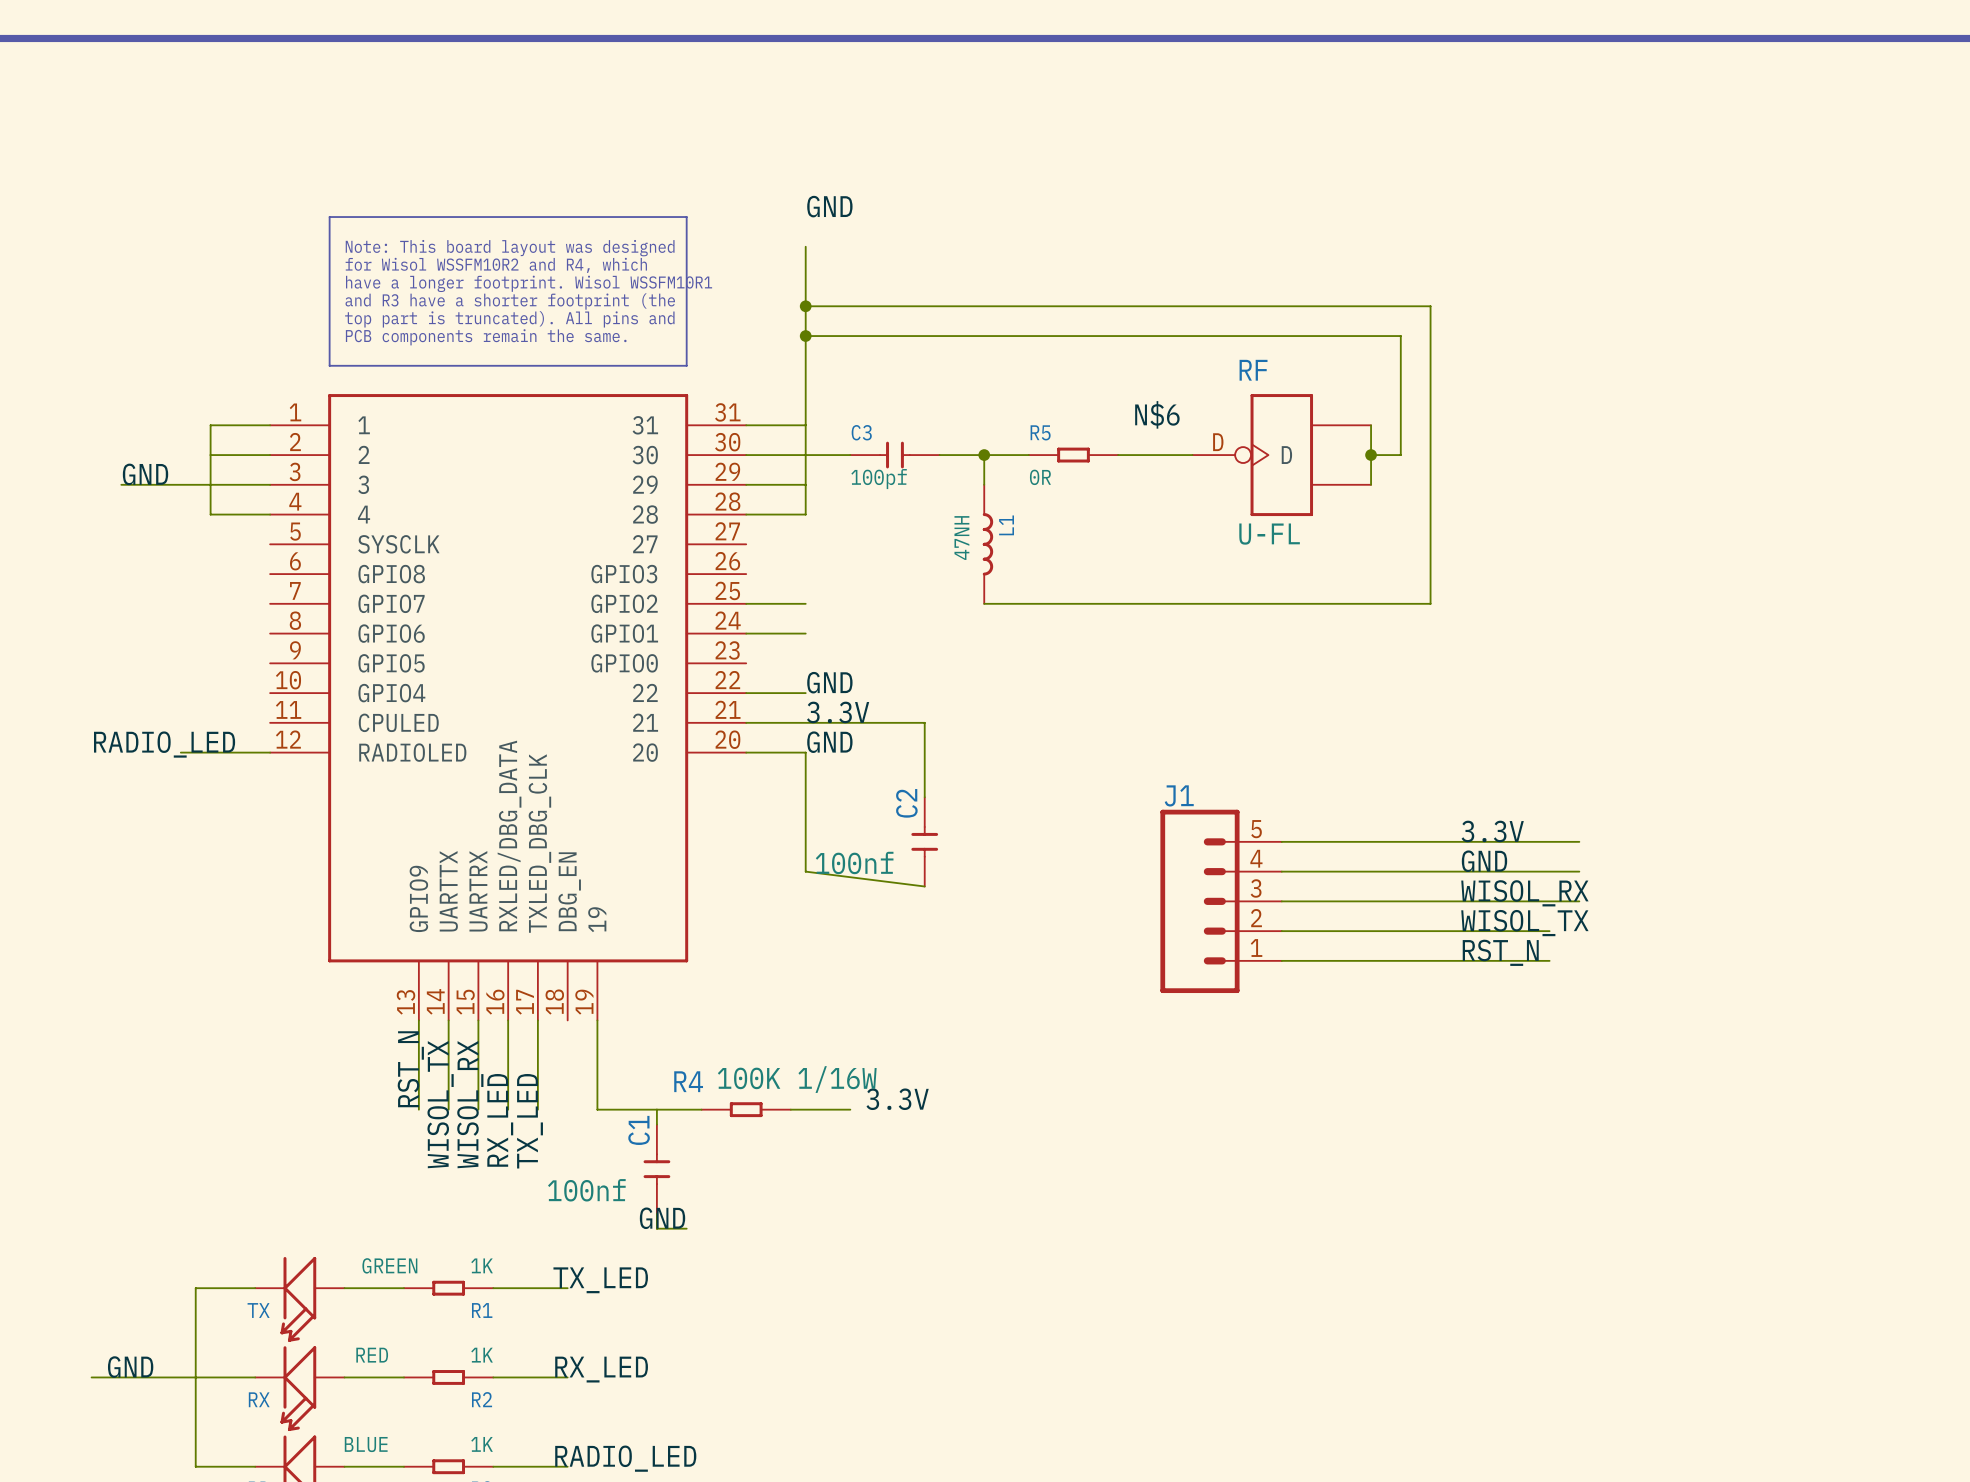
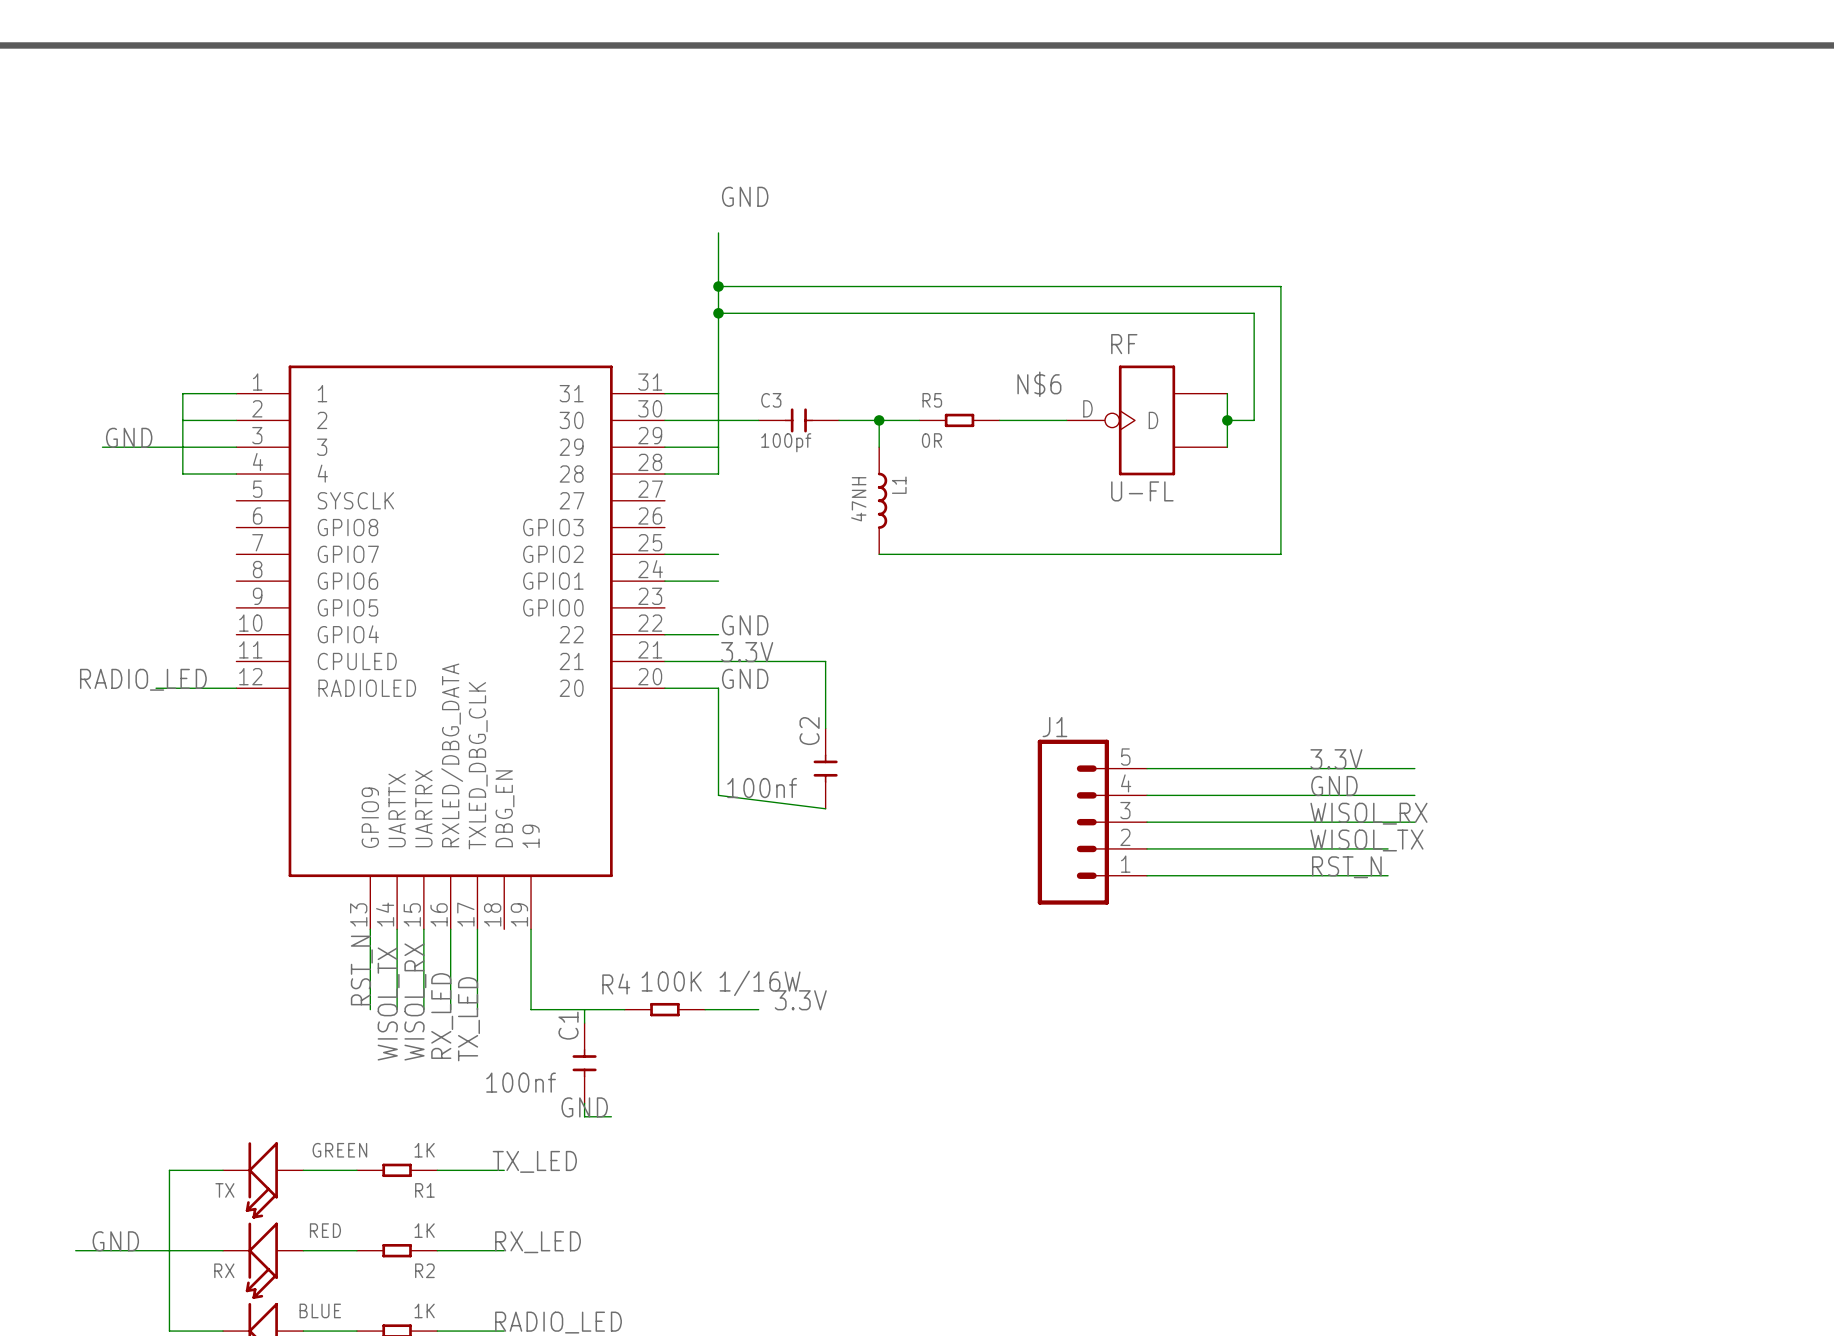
line: (329, 217) (686, 217) (686, 365) (329, 365) (329, 217) -> none
text: Note: This board layout was designed (510, 248) -> none
text: for Wisol WSSFM10R2 and R4, which (496, 265) -> none
text: have a longer footprint. Wisol WSSFM10R1 (529, 283) -> none
text: and R3 have a shorter footprint (the (510, 301) -> none
text: top part is truncated). All pins and (509, 319) -> none
text: PCB components remain the same. (486, 337) -> none

